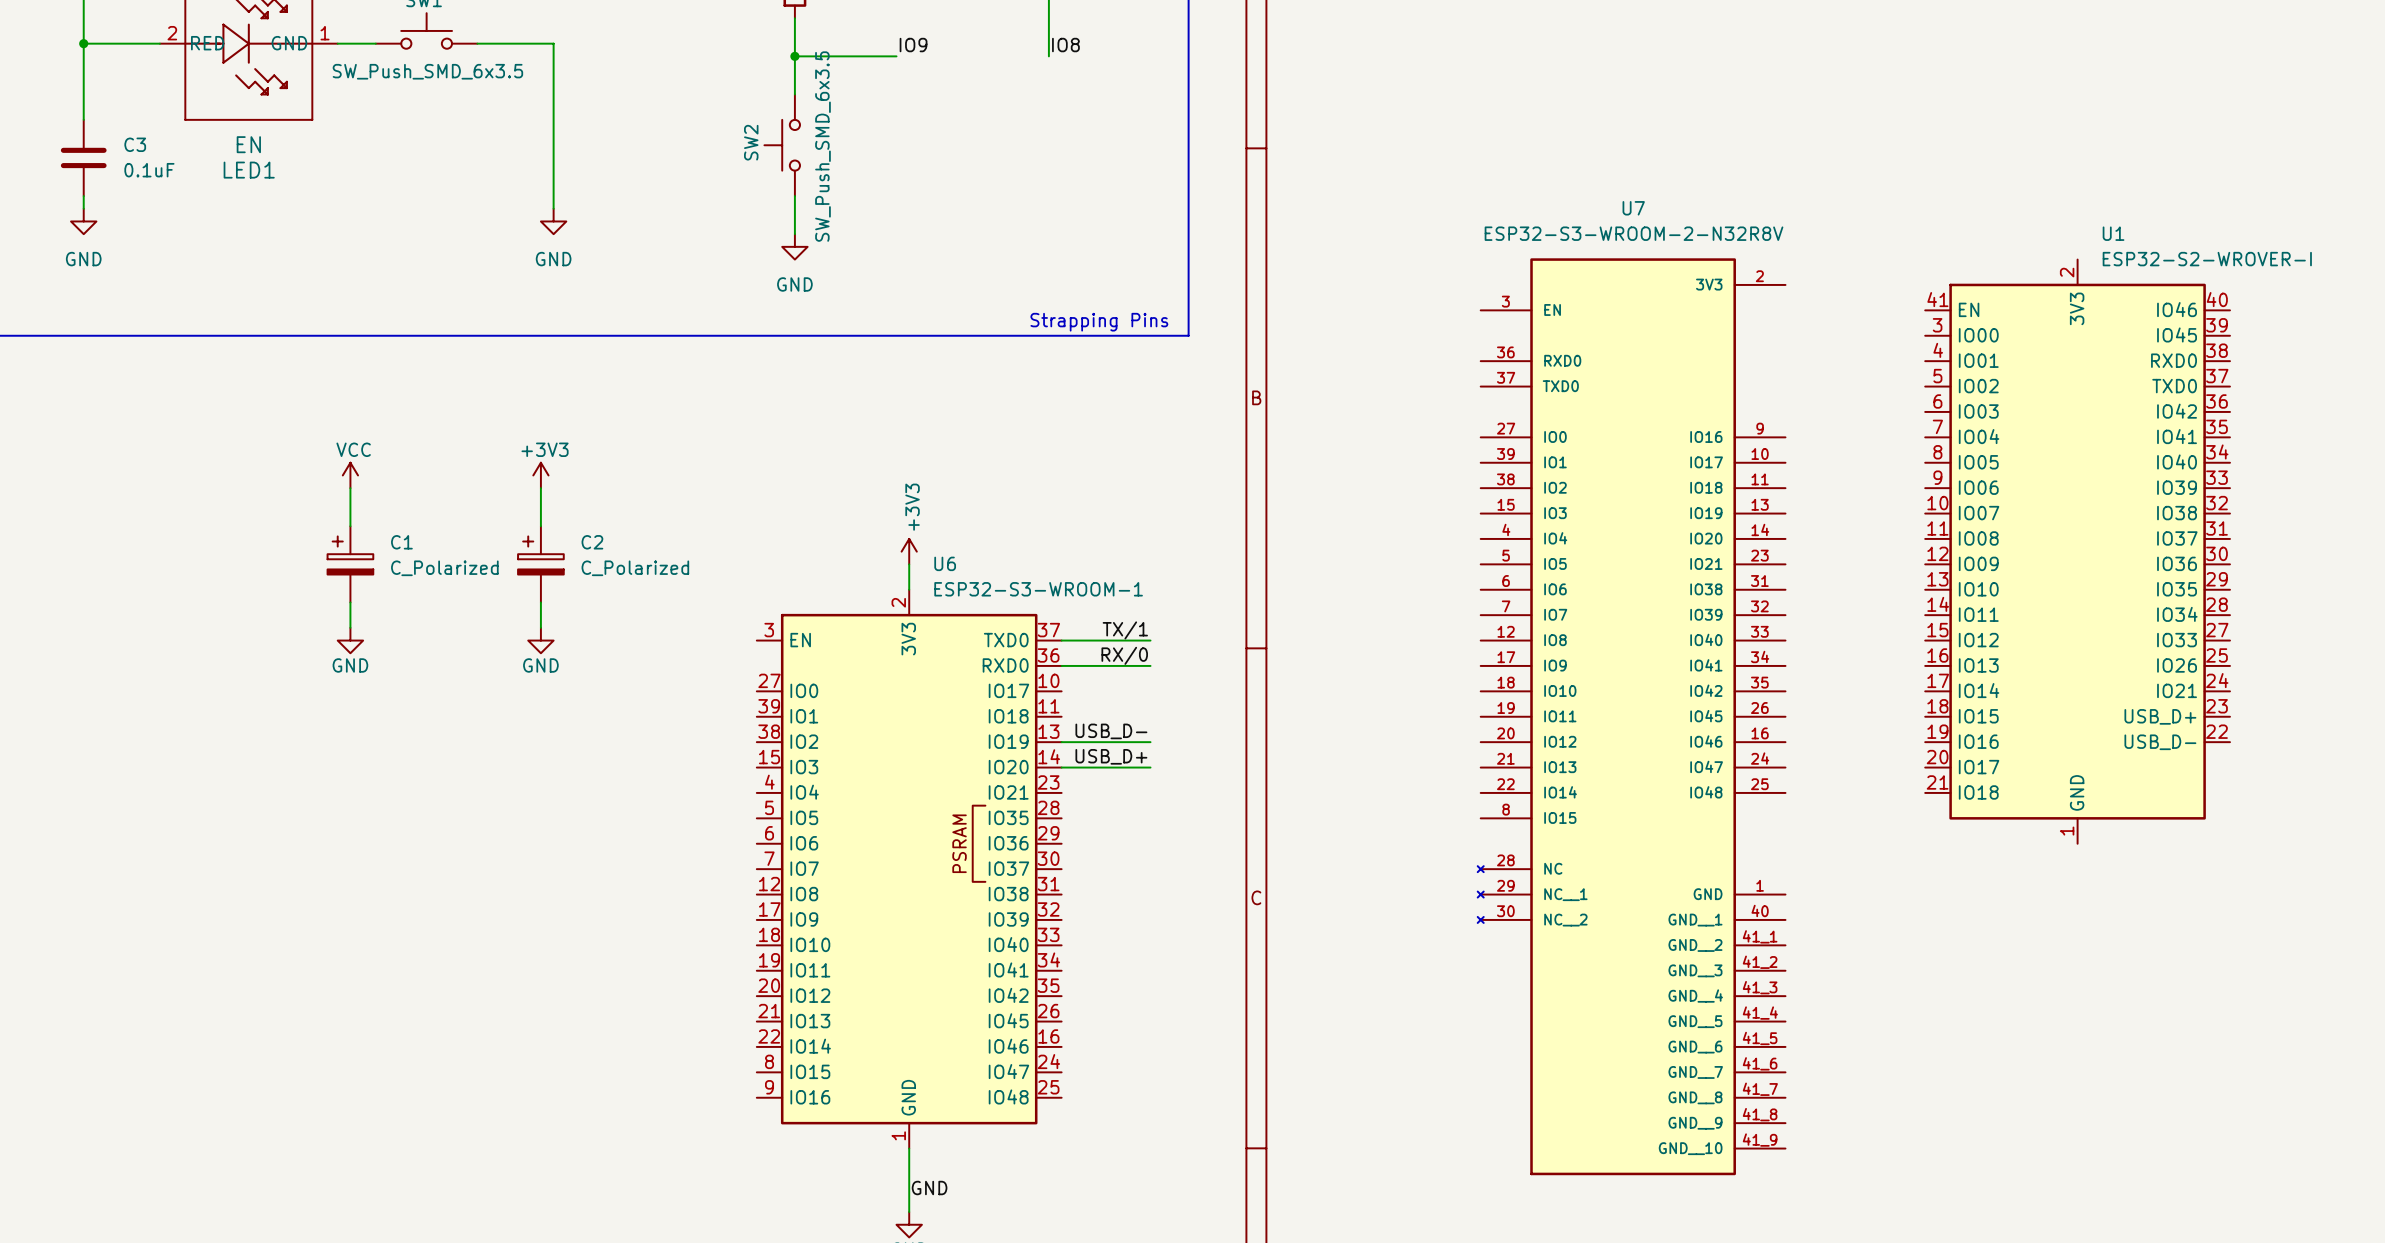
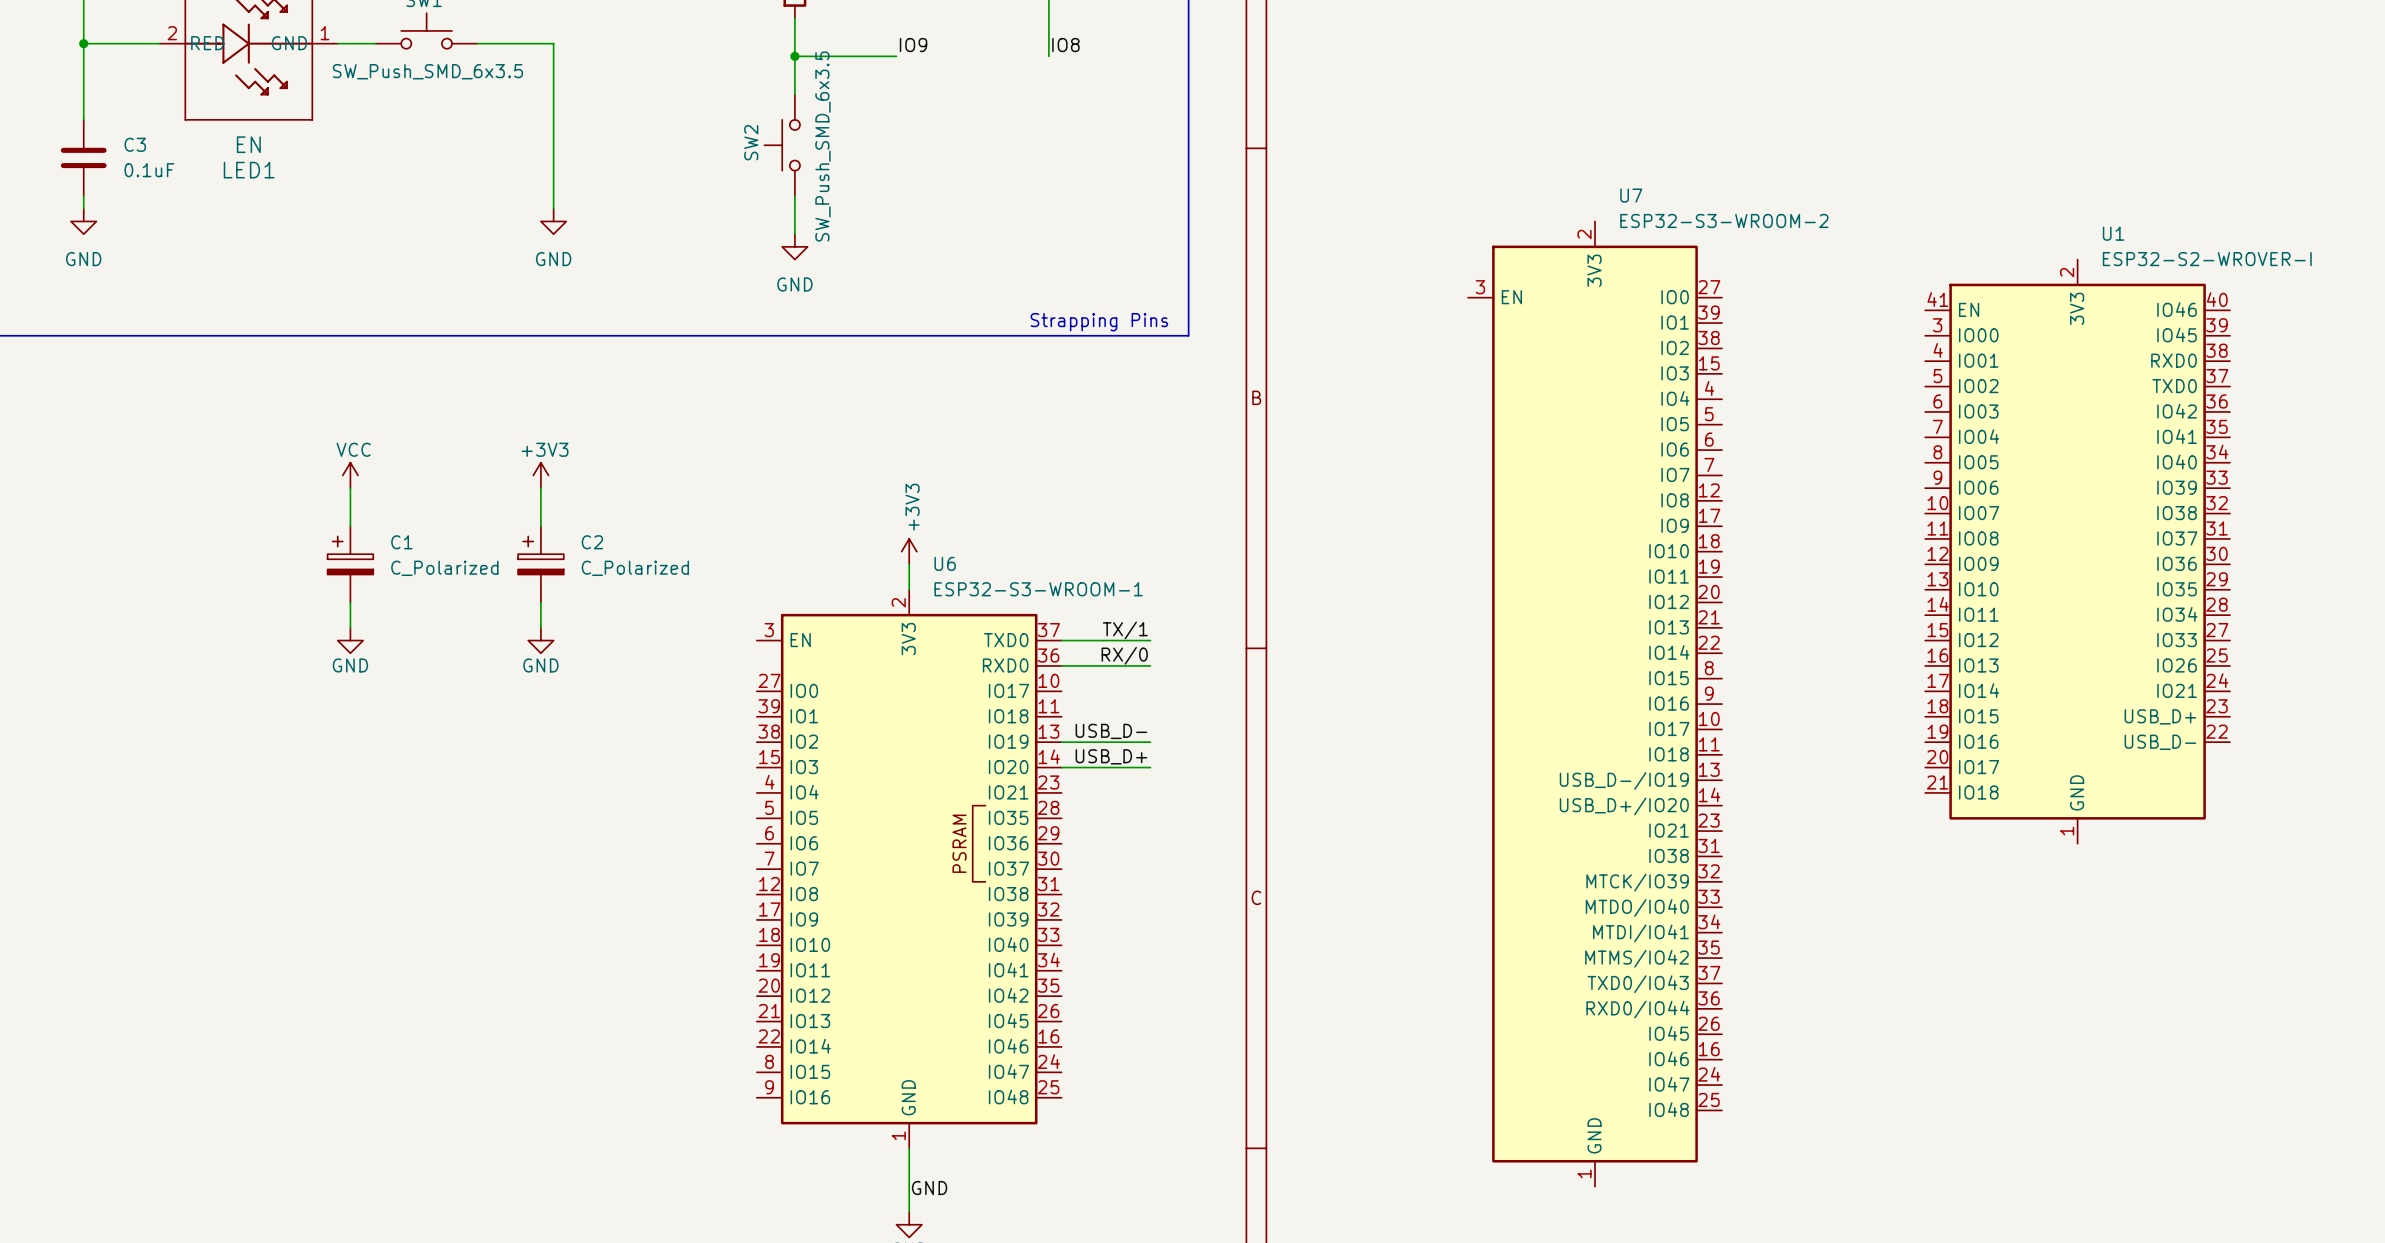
U7 name position: U7 (1633, 208) -> U7 (1631, 195)
U7 value: ESP32-S3-WROOM-2-N32R8V (1634, 233) -> ESP32-S3-WROOM-2 (1724, 220)
U7 symbol: [1477, 258, 1786, 1176] -> [1468, 221, 1723, 1187]

